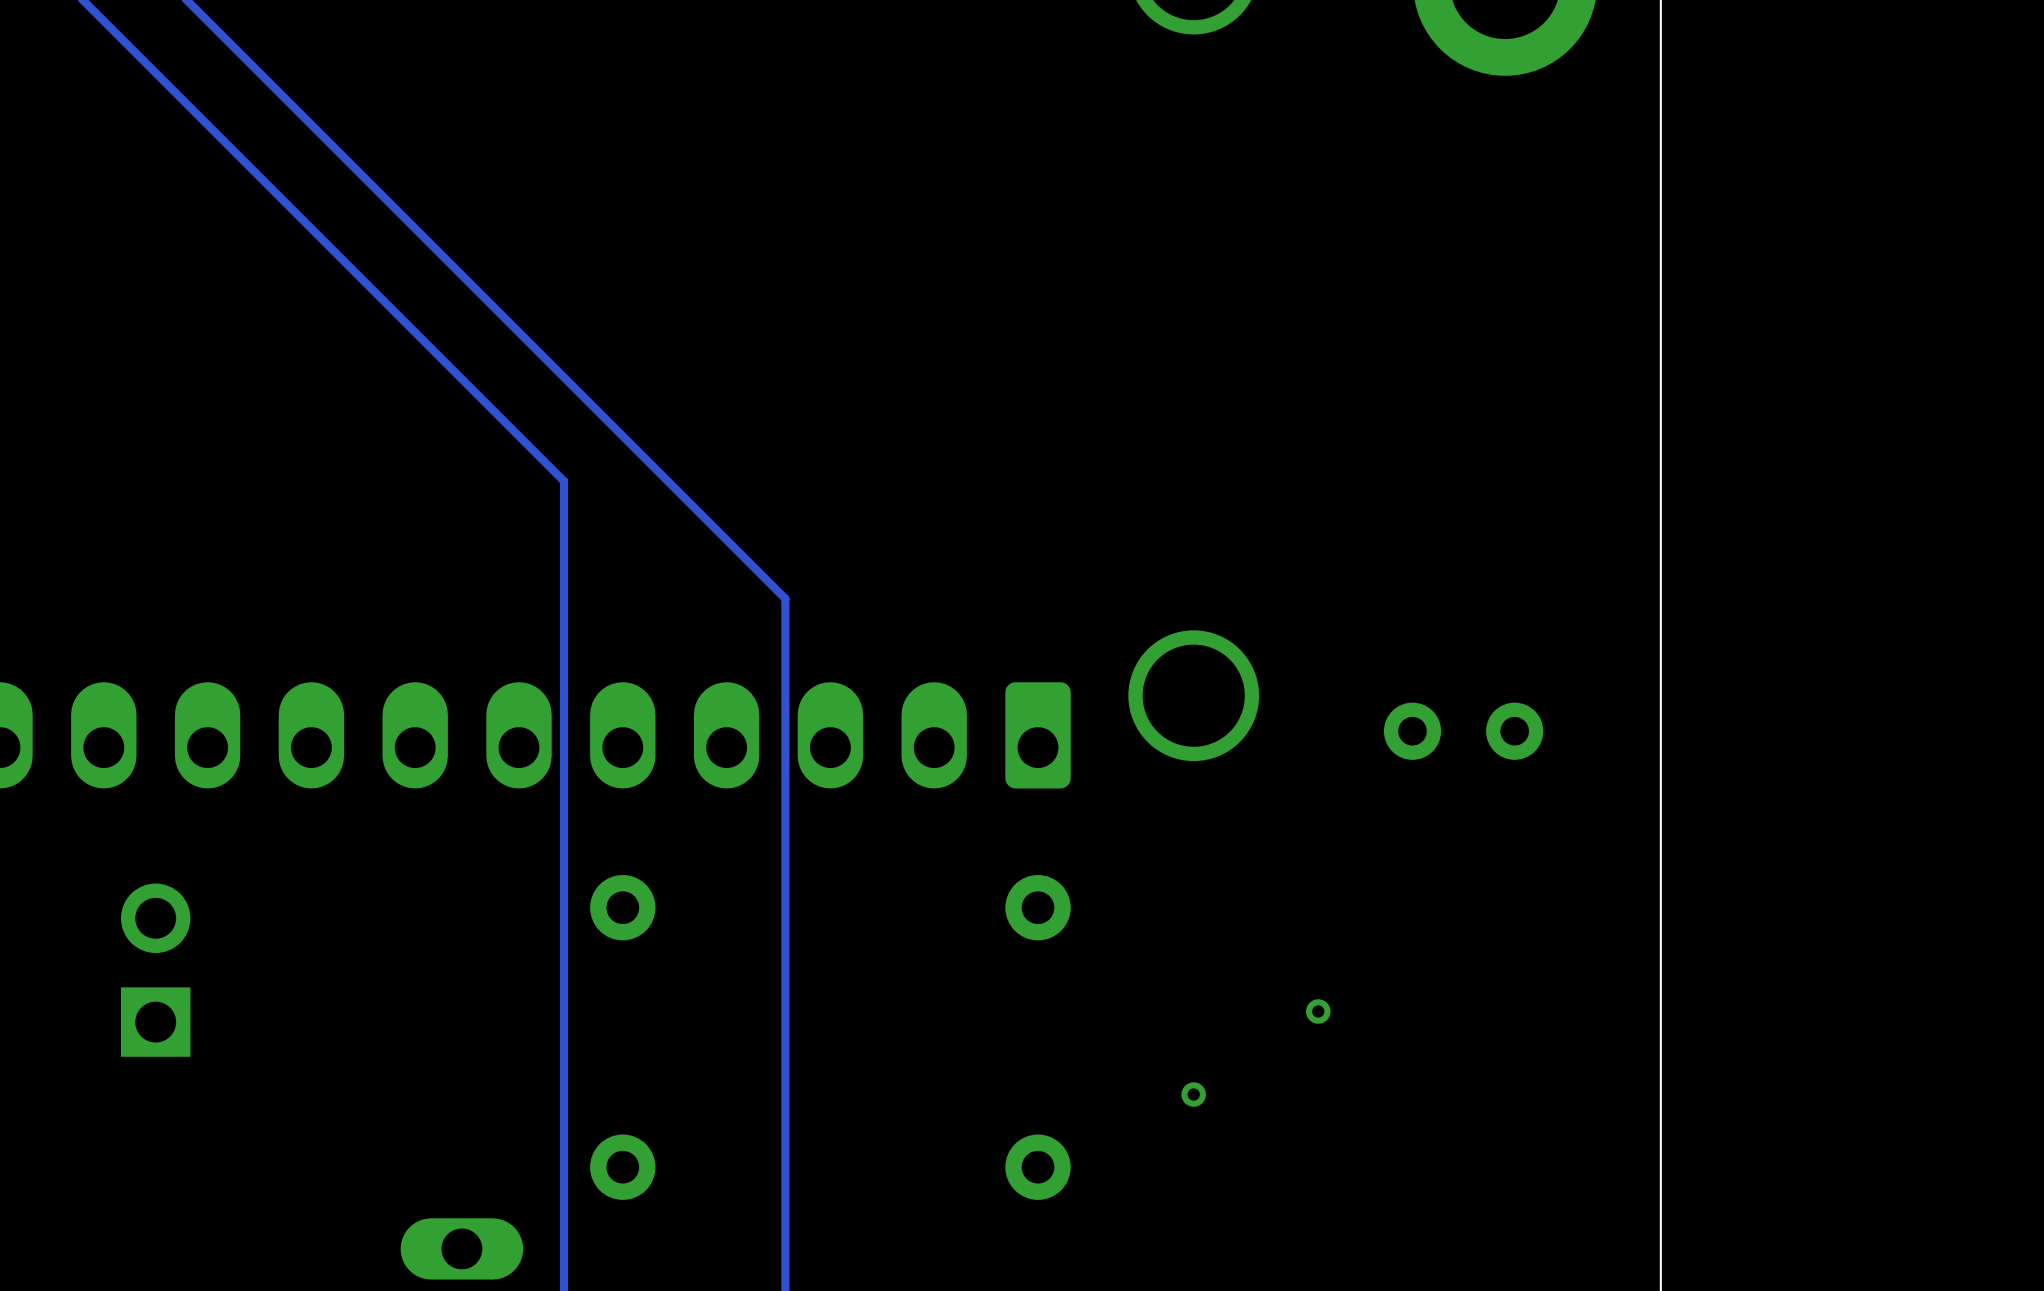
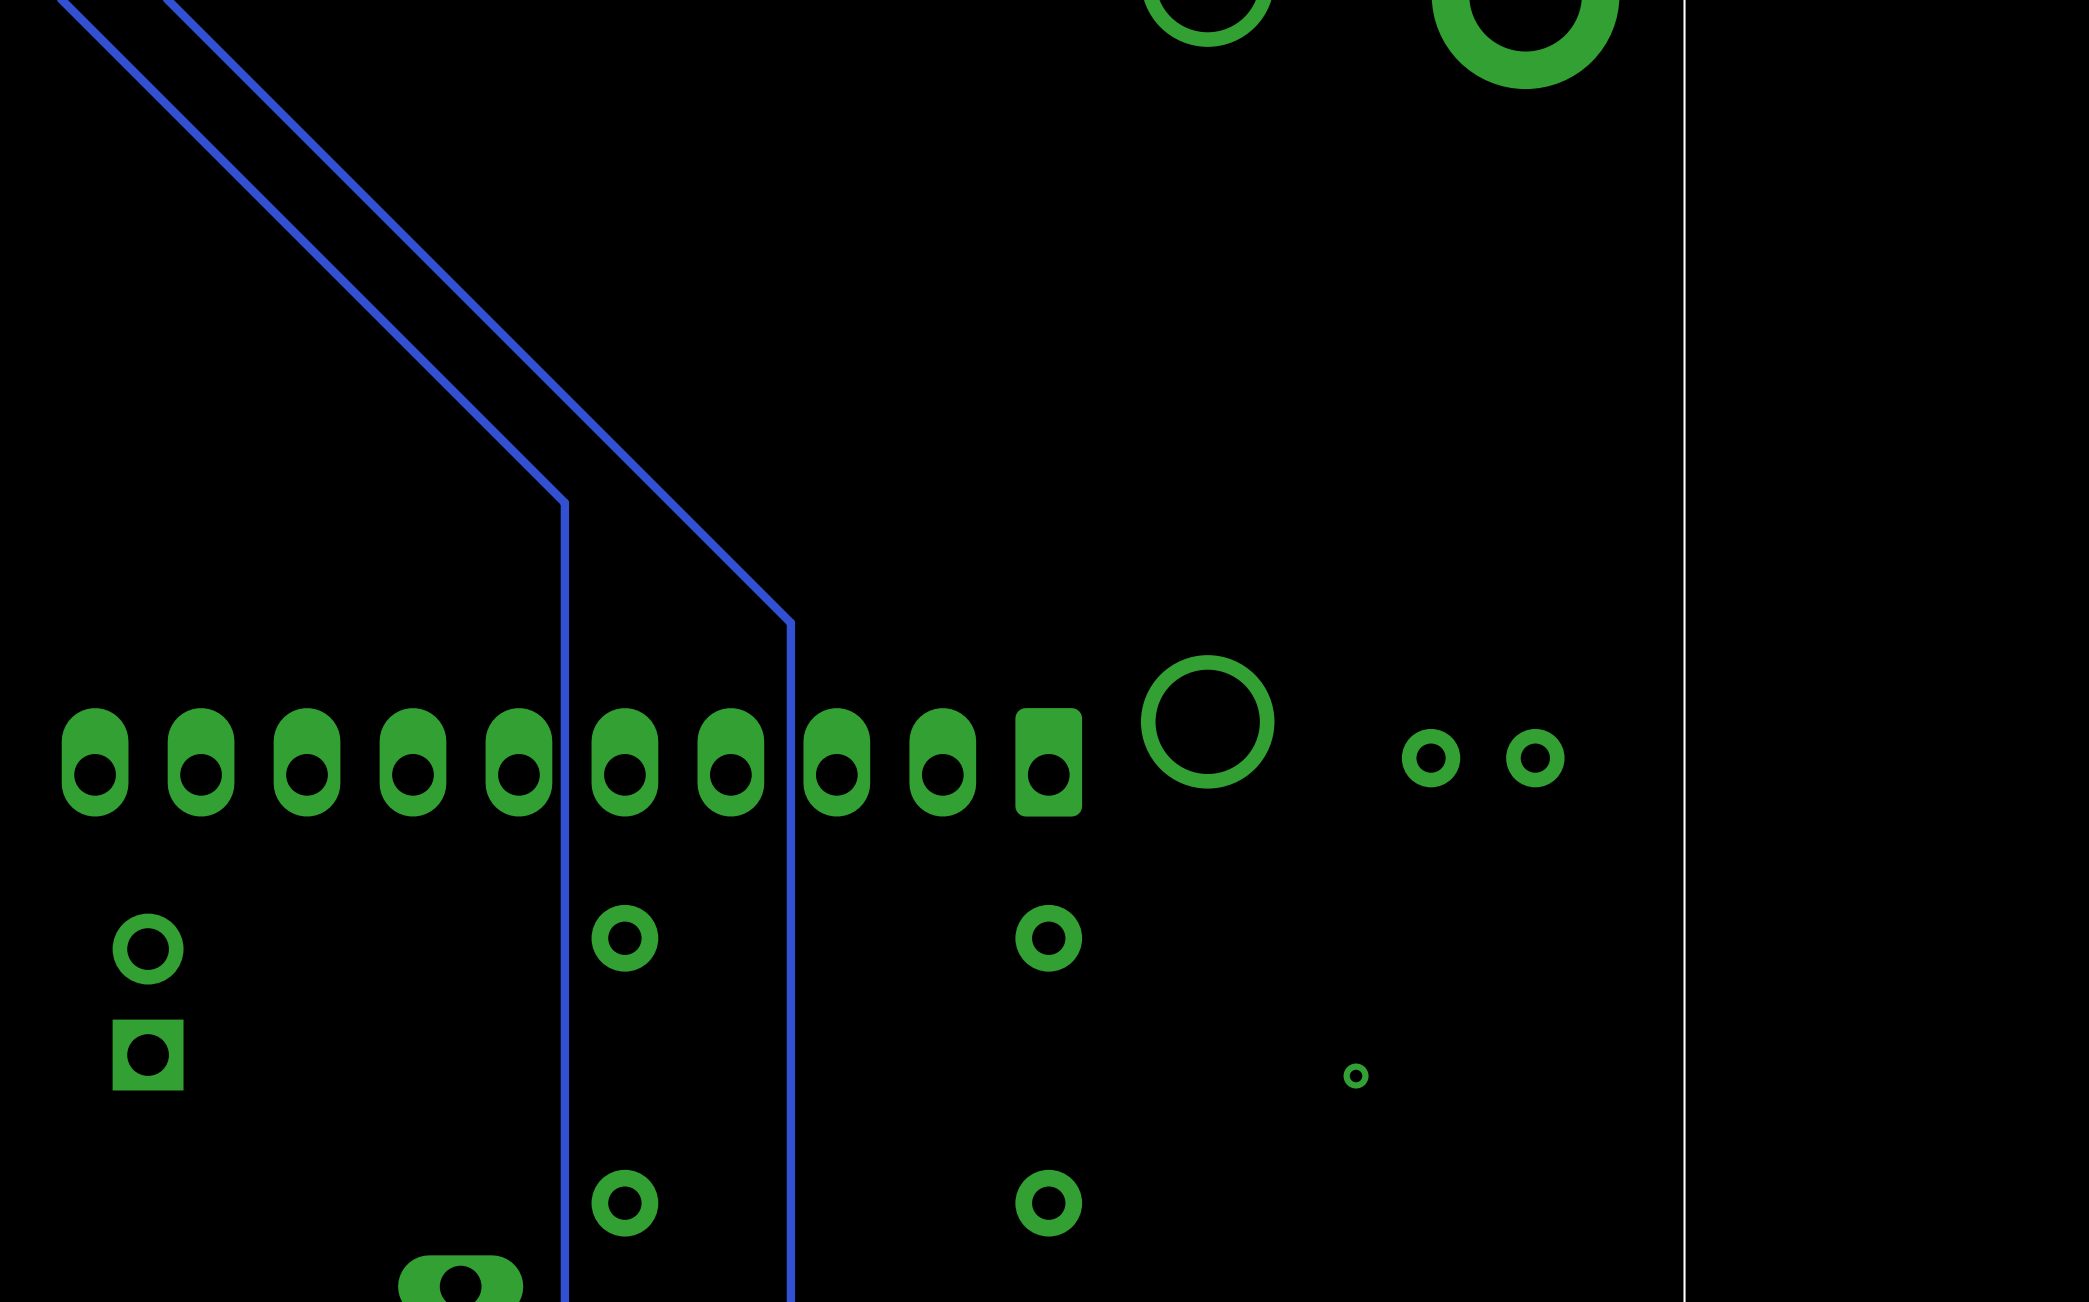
via position: (1318, 1011) -> (1356, 1076)
via: (1193, 1094) -> none

